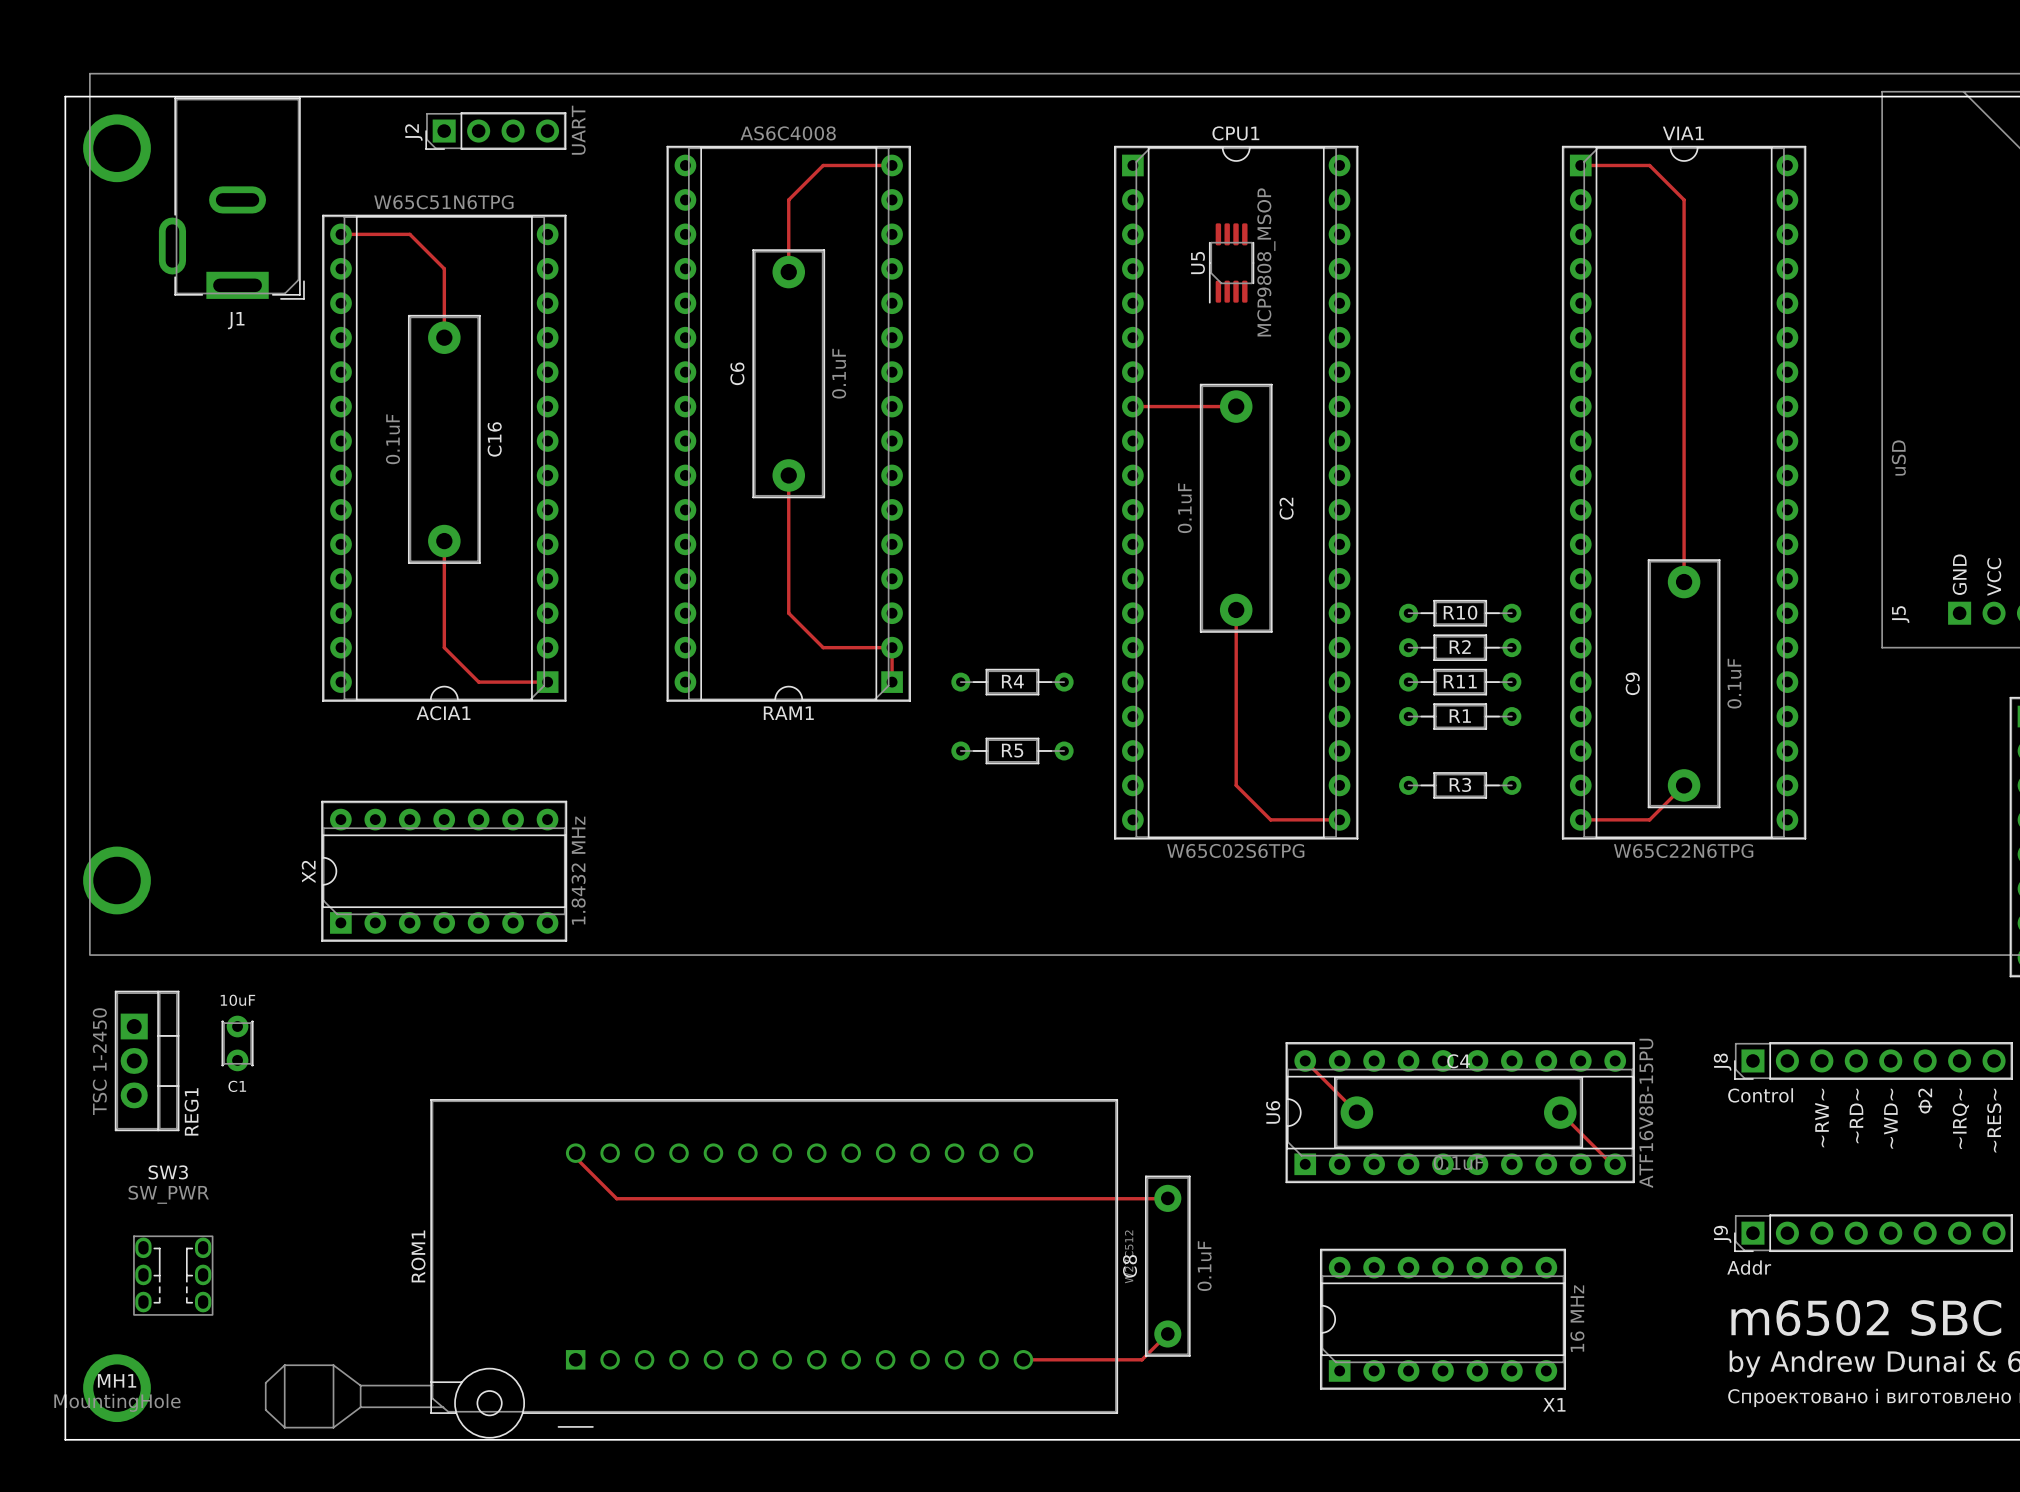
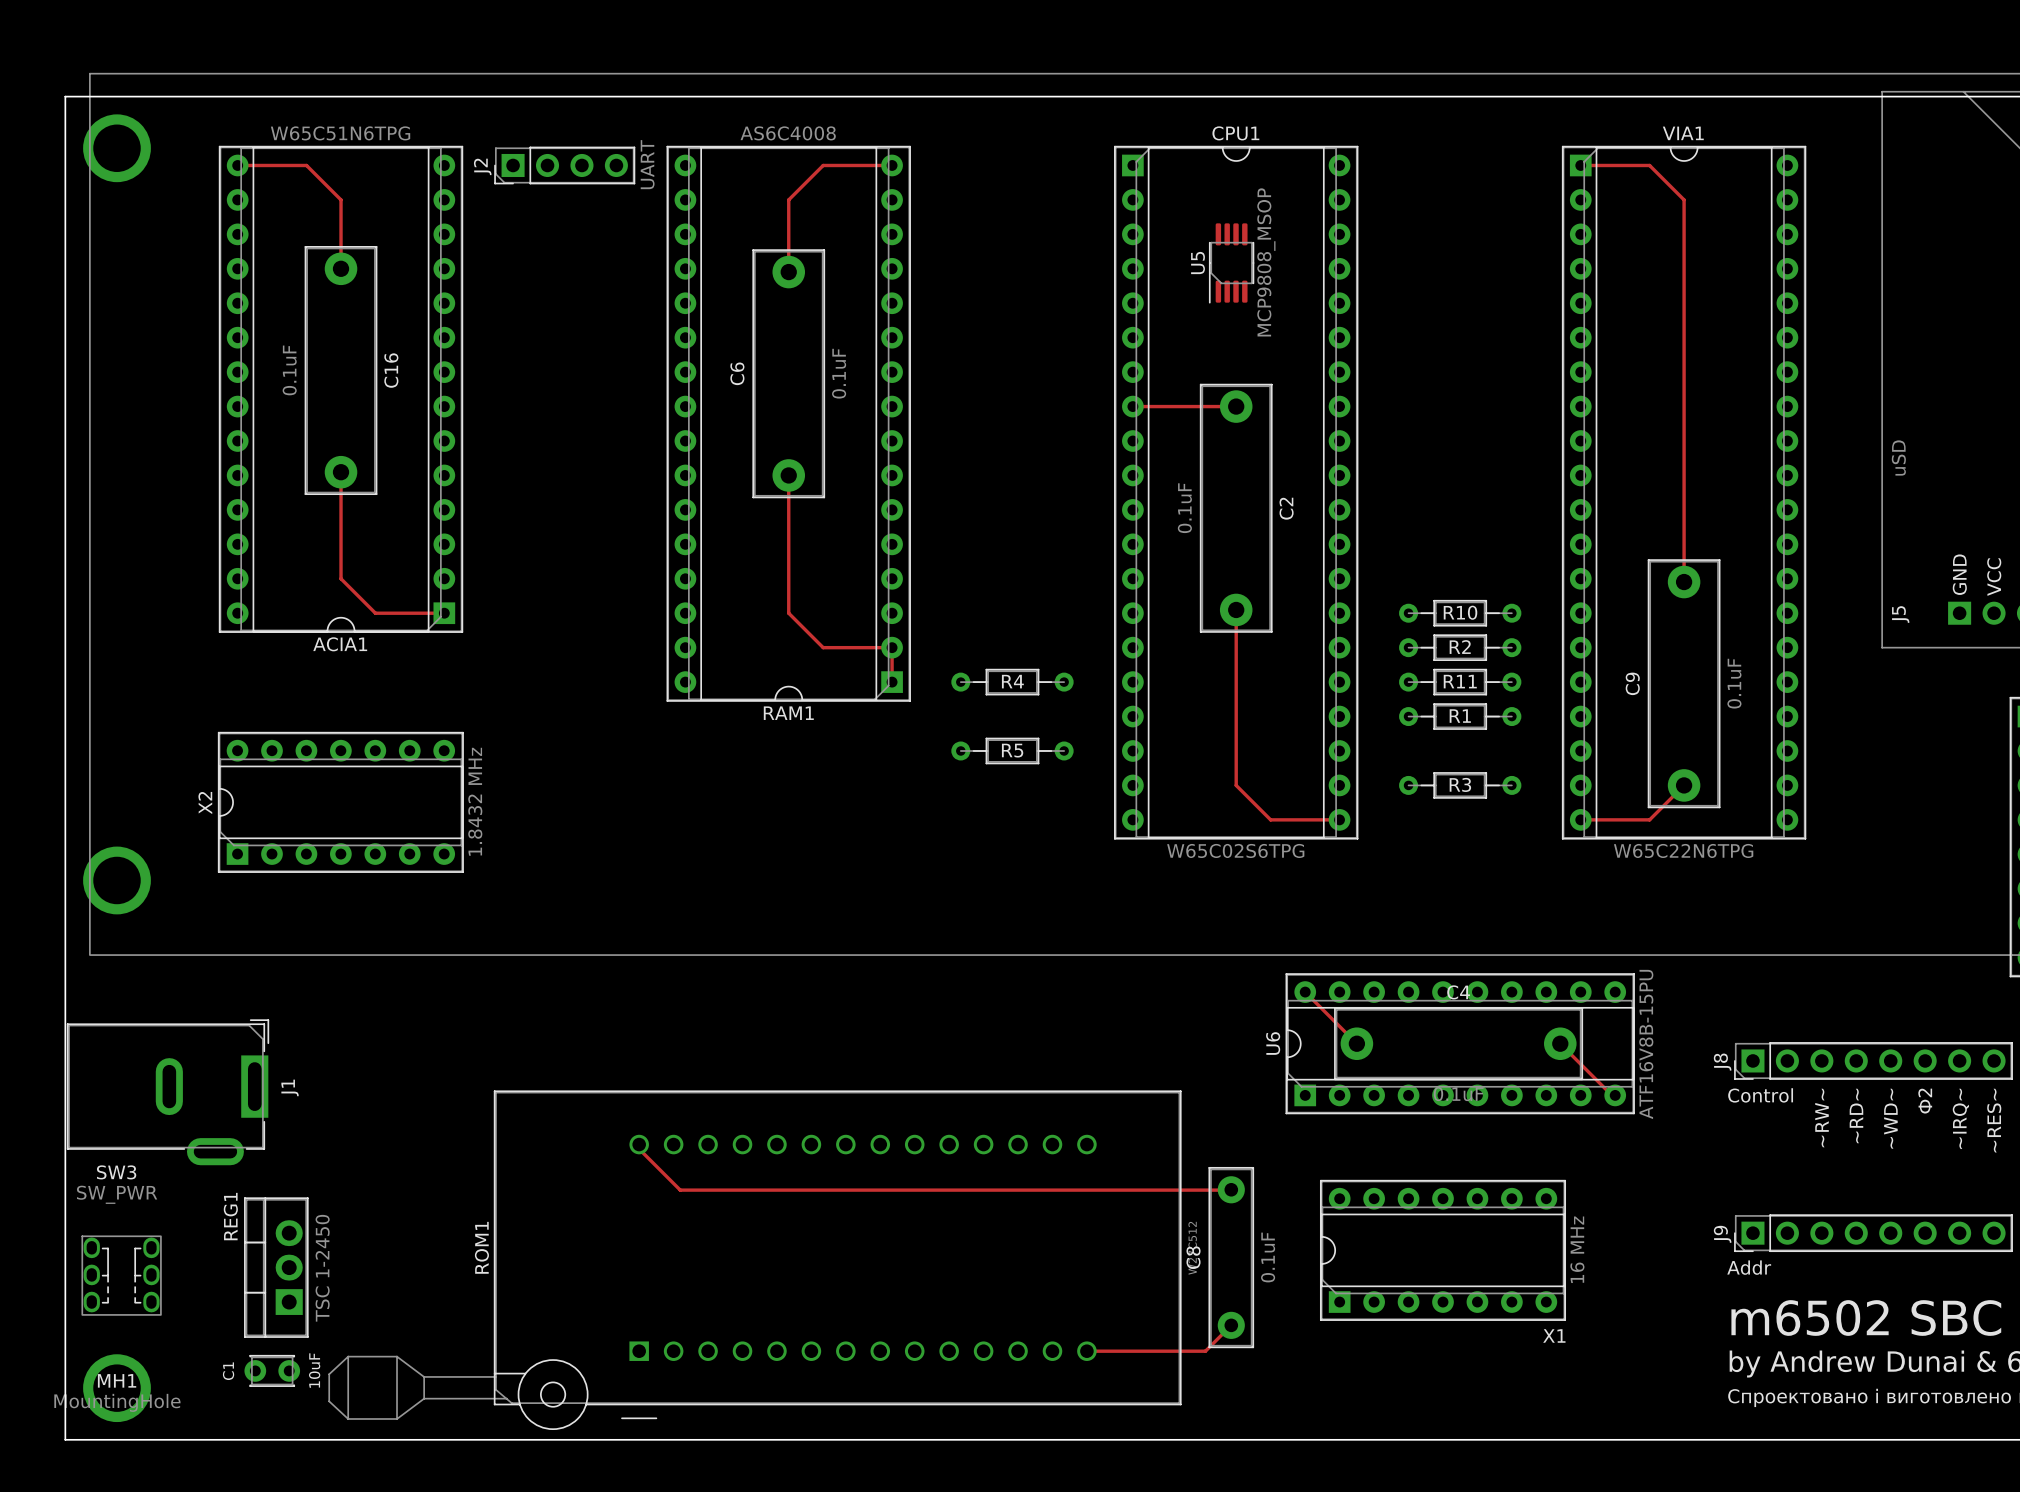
J2 position: (495, 131) -> (564, 165)
J1 rotation: 0° (231, 198) -> 90° counterclockwise (167, 1092)
J1 position: (231, 198) -> (167, 1092)
top track: (341, 234) (409, 234) (444, 268) (444, 337) -> (237, 165) (306, 165) (341, 199) (341, 268)
C16 position: (444, 439) -> (341, 370)
ACIA1 position: (444, 458) -> (341, 389)
top track: (444, 541) (444, 647) (478, 682) (547, 682) -> (341, 472) (341, 578) (375, 613) (444, 613)
X2 position: (444, 871) -> (340, 802)
C1 rotation: 0° (237, 1043) -> 90° clockwise (272, 1370)
C1 position: (237, 1043) -> (272, 1370)
REG1 rotation: 0° (147, 1060) -> 180° (276, 1267)
REG1 position: (147, 1060) -> (276, 1267)
top track: (1305, 1060) (1356, 1112) -> (1305, 992) (1356, 1043)
C4 position: (1458, 1112) -> (1458, 1043)
U6 position: (1460, 1112) -> (1460, 1043)
top track: (1560, 1112) (1611, 1164) (1615, 1164) -> (1560, 1043) (1611, 1095) (1615, 1095)
top track: (575, 1153) (575, 1157) (616, 1198) (1167, 1198) -> (639, 1144) (639, 1149) (680, 1190) (1231, 1189)
C8 position: (1167, 1266) -> (1231, 1257)
ROM1 position: (691, 1268) -> (755, 1260)
SW3 position: (173, 1275) -> (121, 1275)
X1 position: (1442, 1319) -> (1442, 1250)
top track: (1167, 1333) (1141, 1359) (1023, 1359) -> (1231, 1325) (1205, 1351) (1086, 1351)

